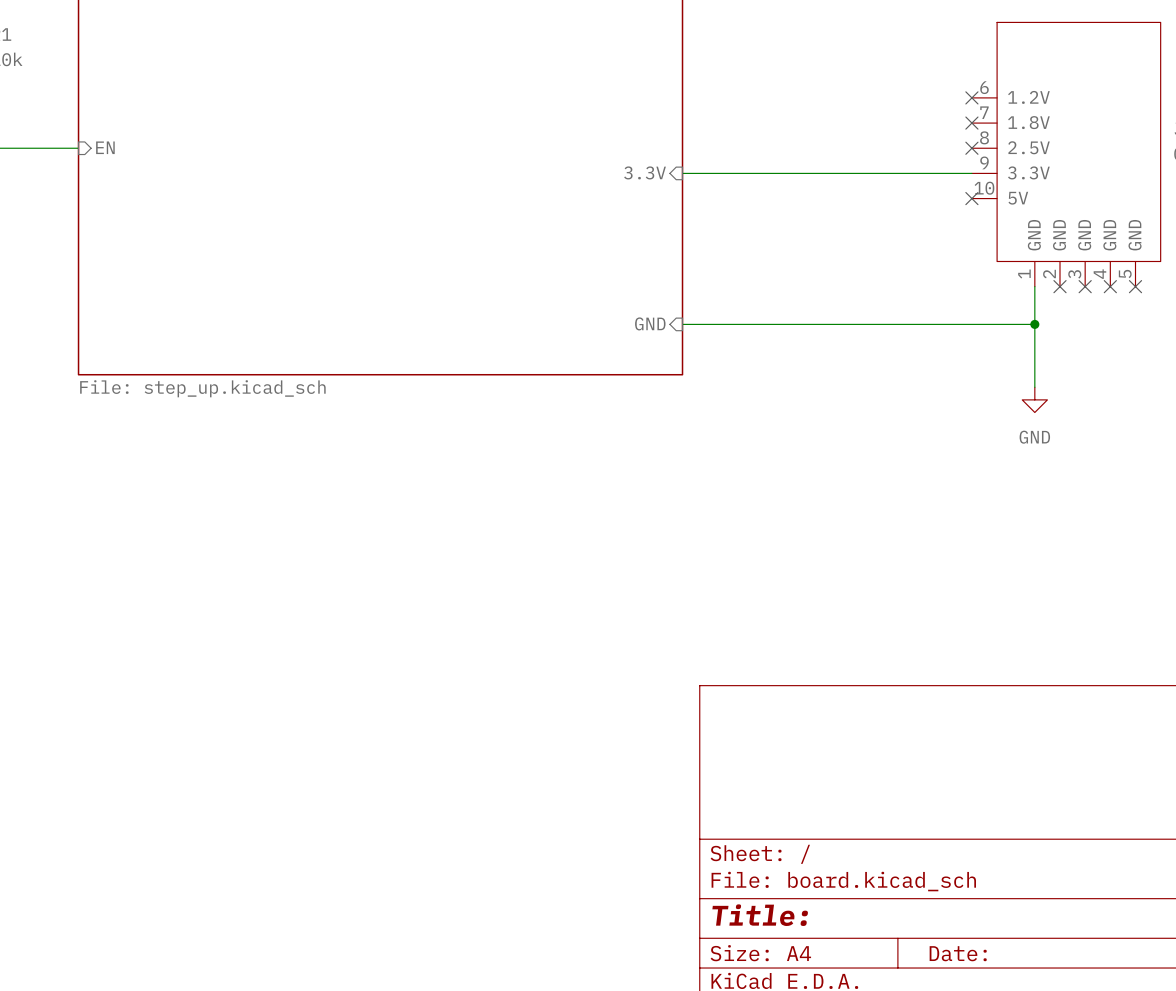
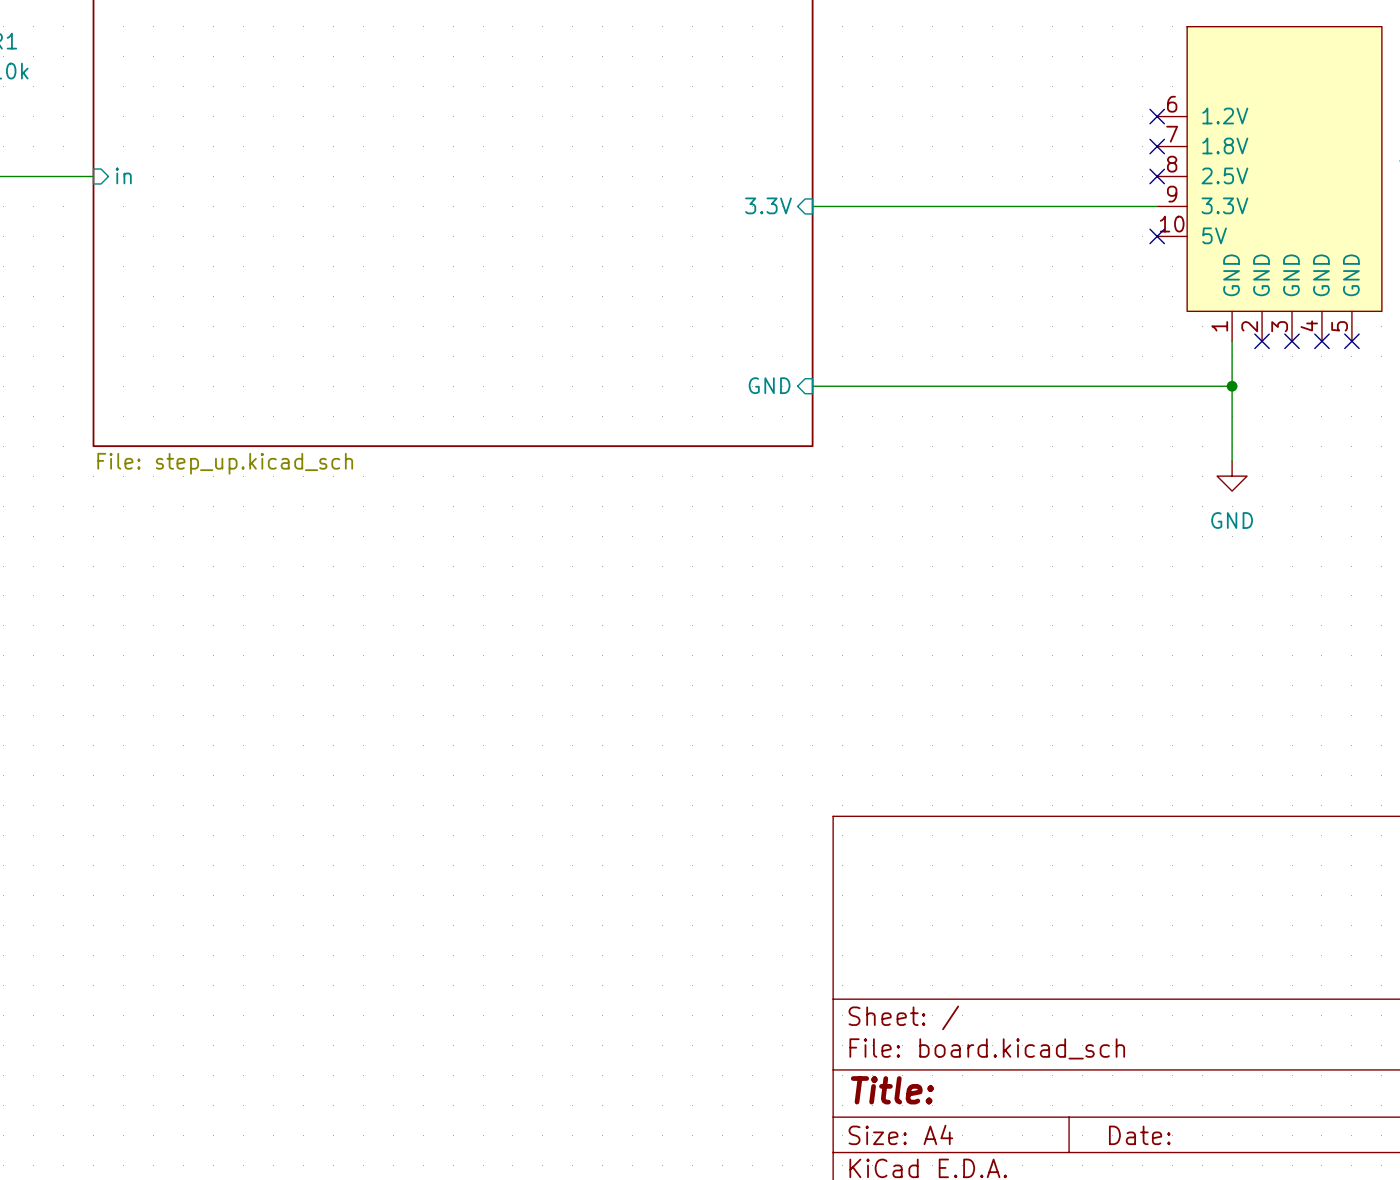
sheet pin: EN (105, 147) -> in (123, 175)

